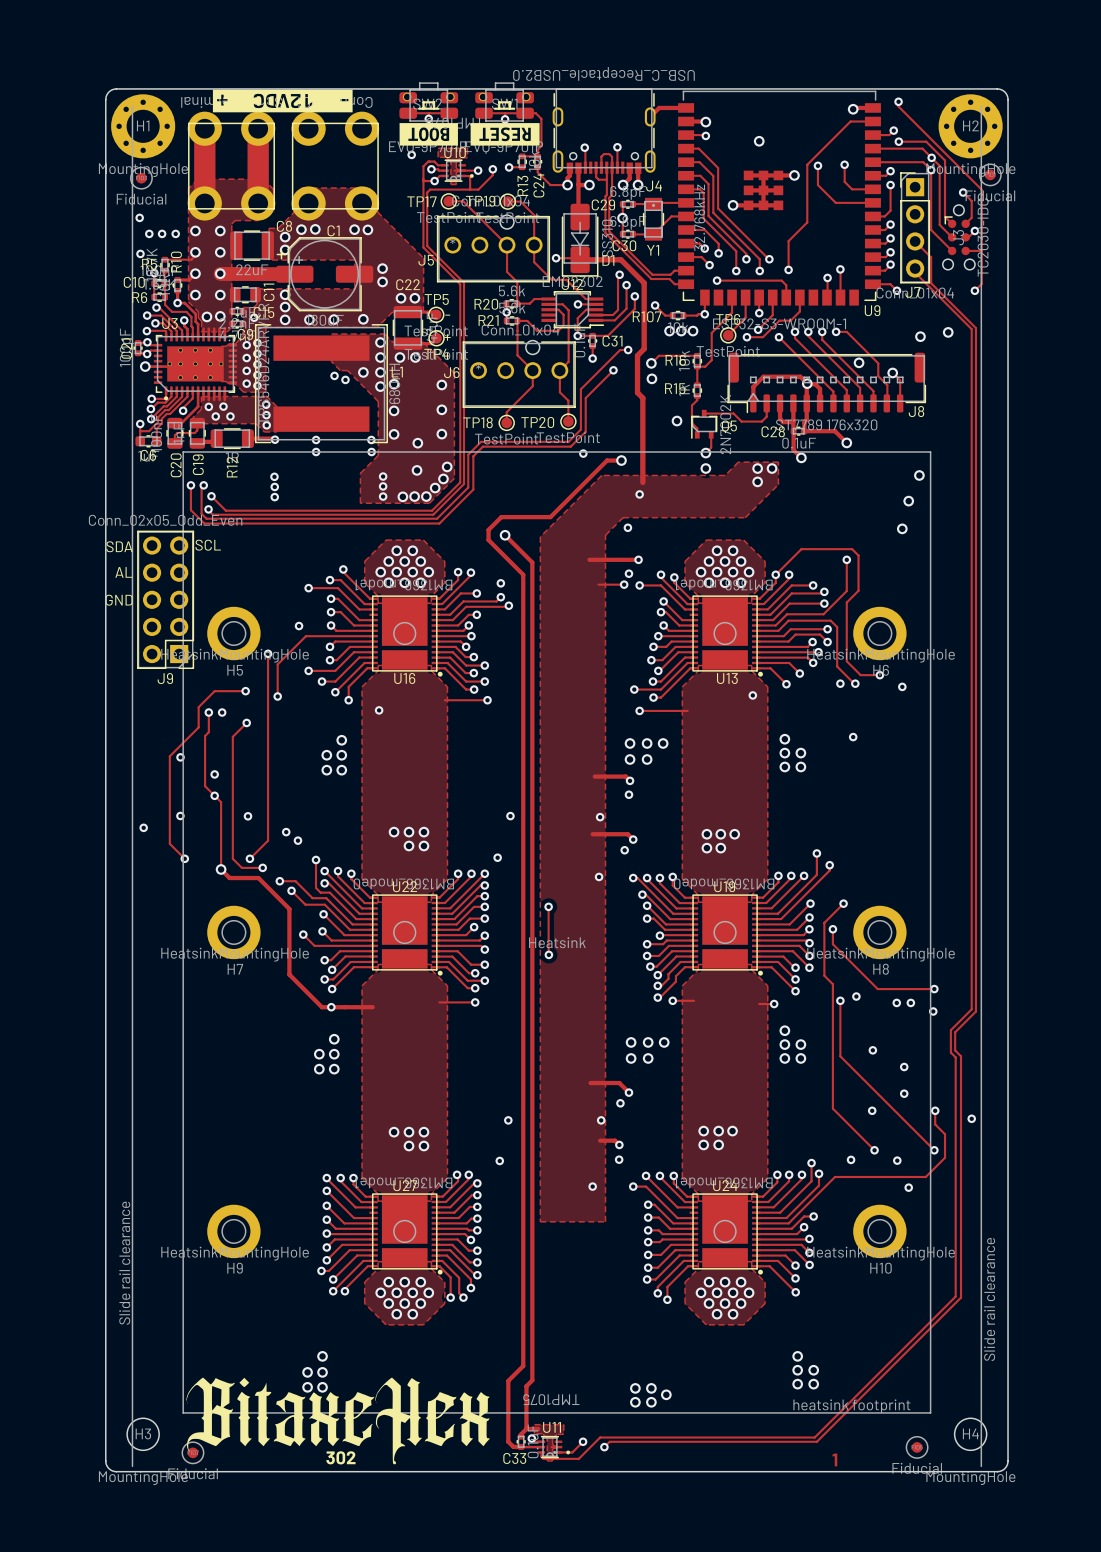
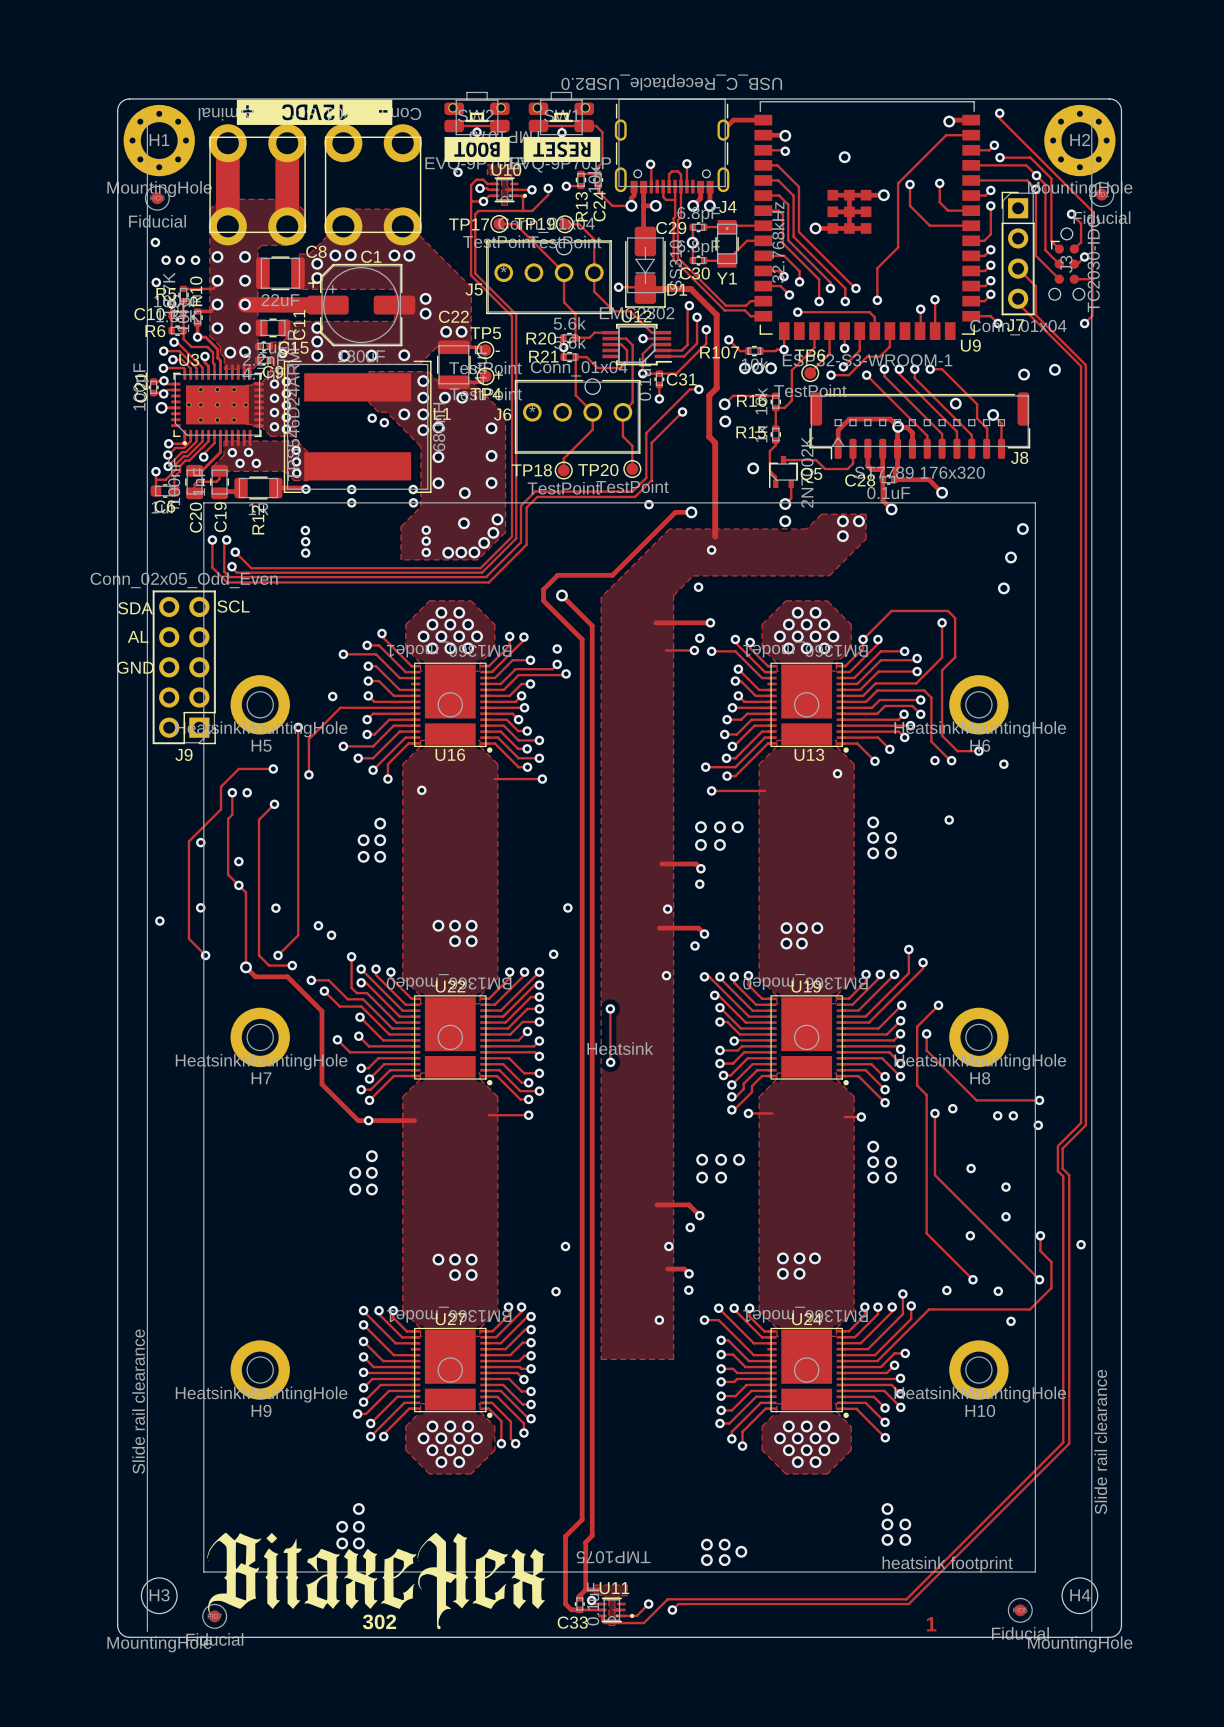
track: (160, 366) (171, 366) -> none

